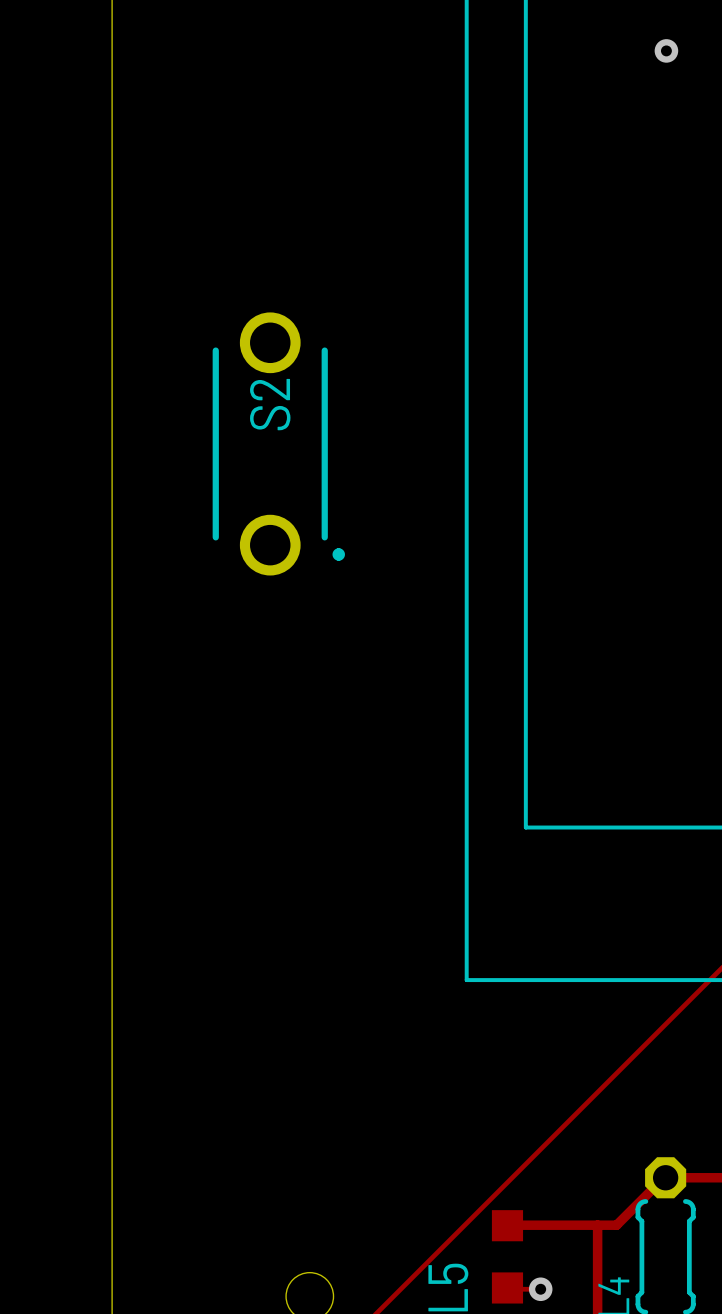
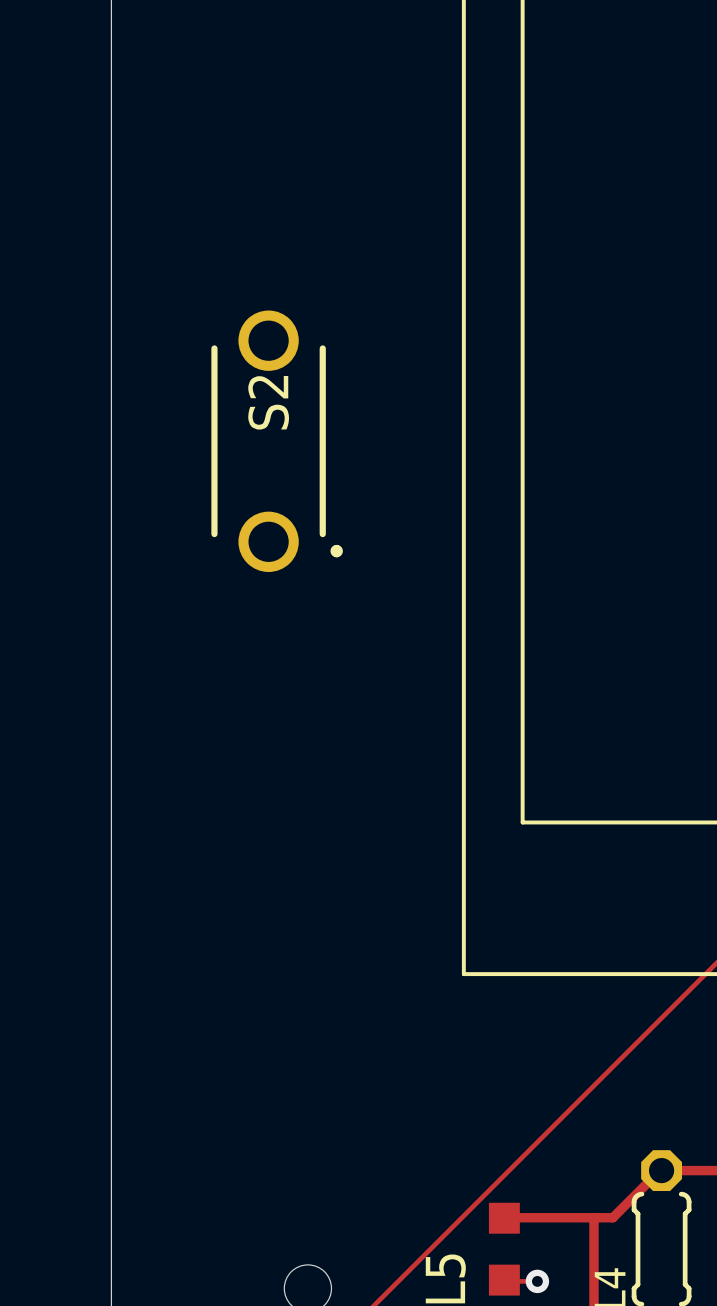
via: (666, 50) -> none

